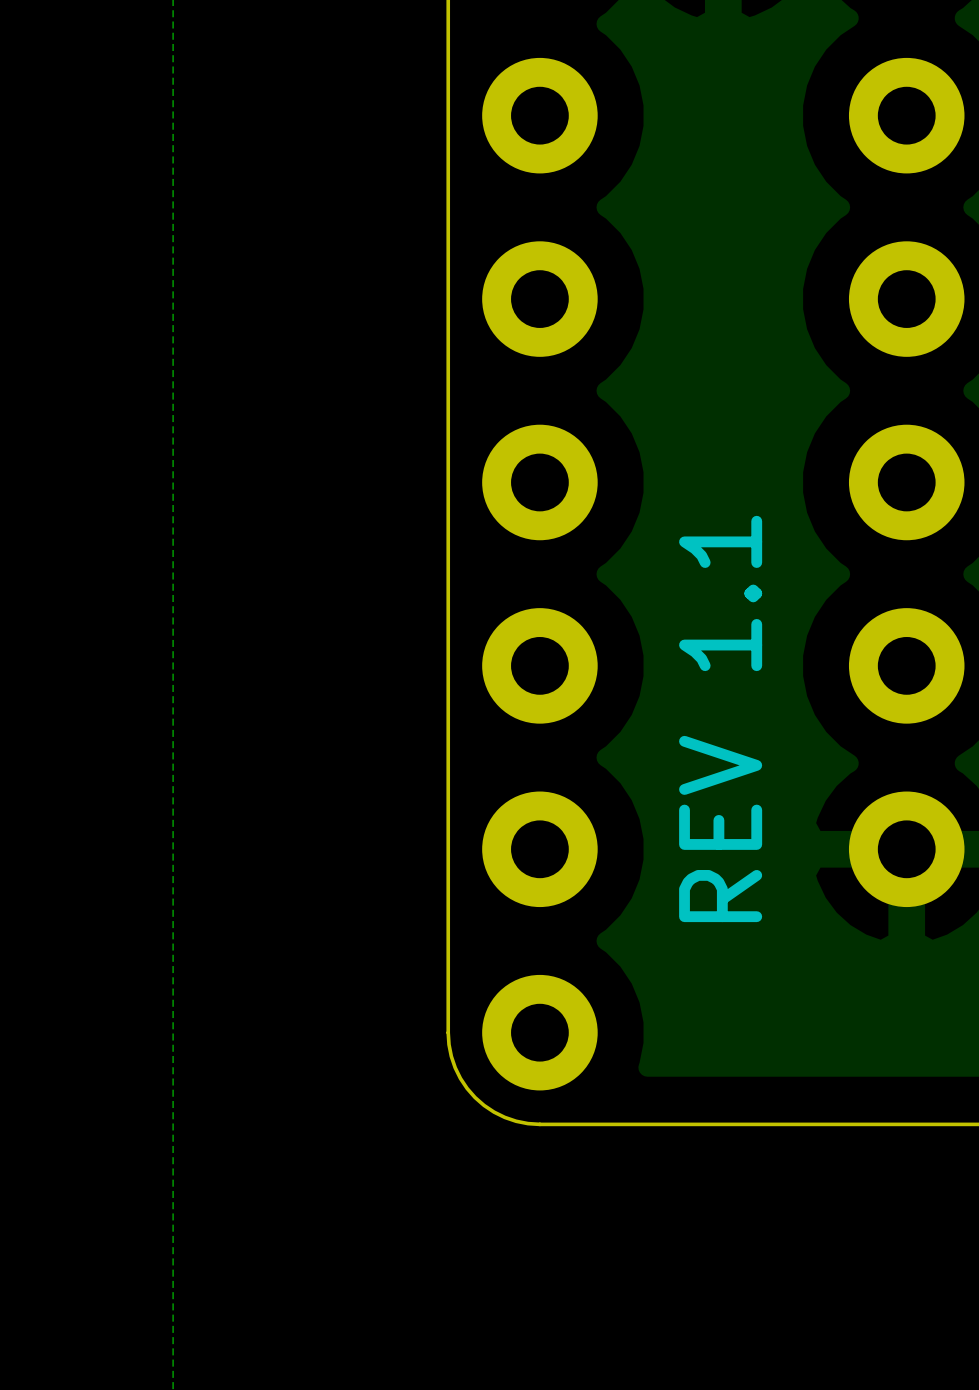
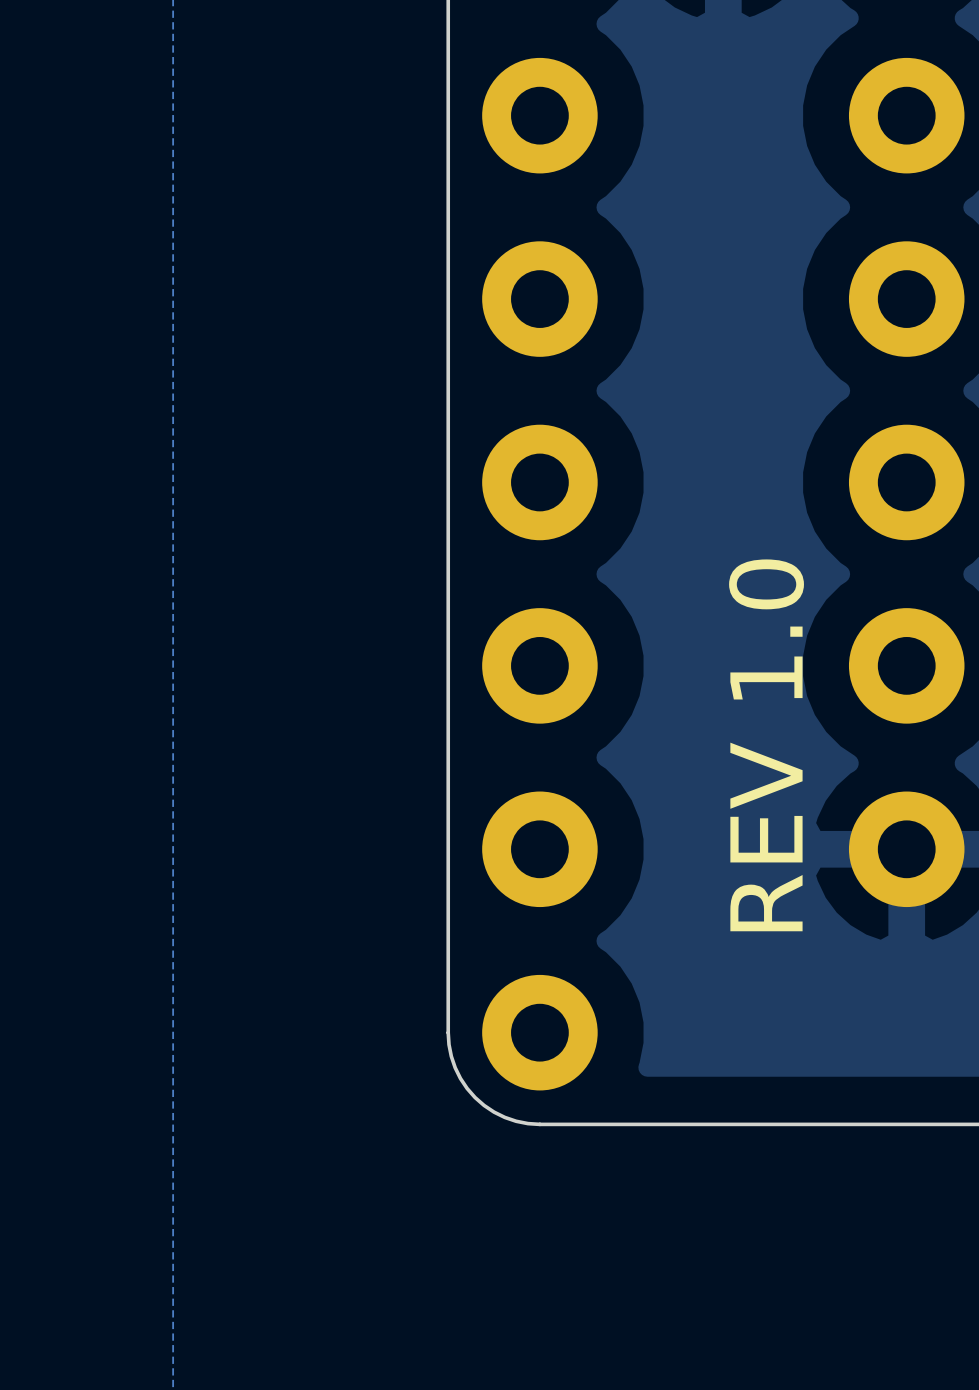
text: REV 1.1 (720, 718) -> REV 1.0 (766, 745)

